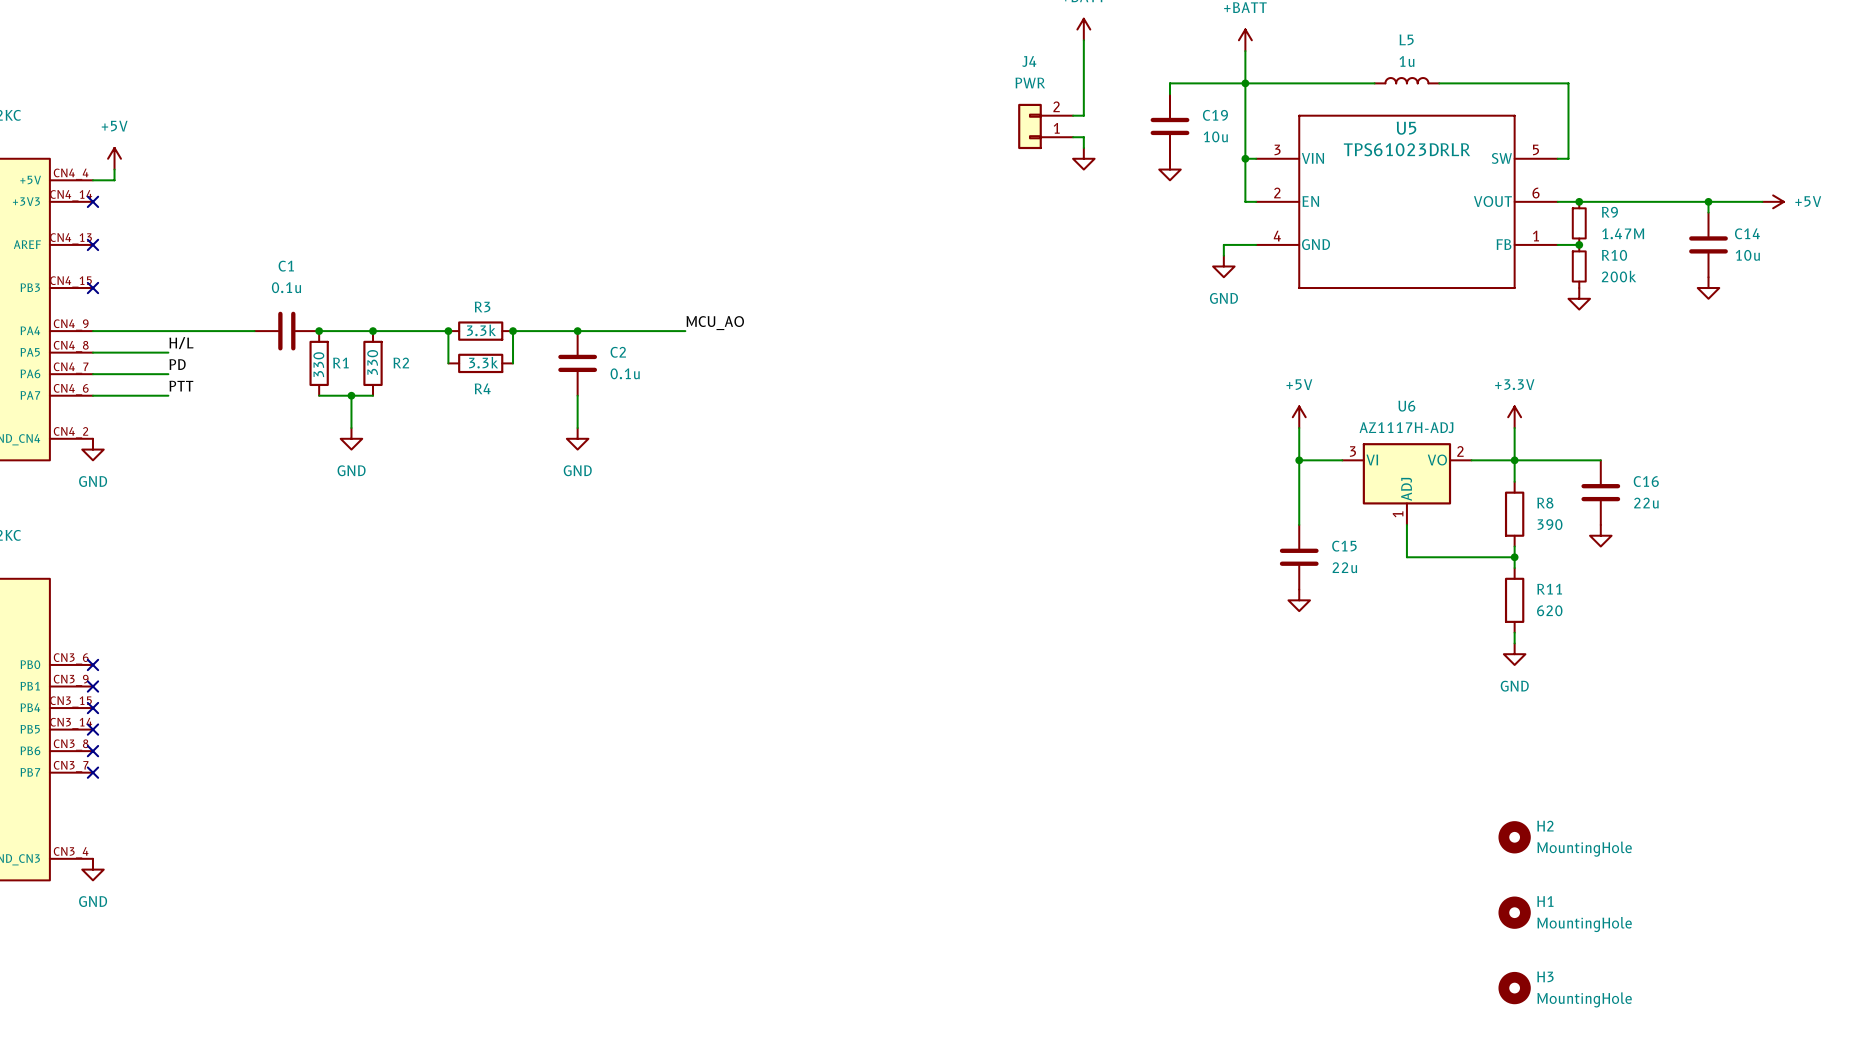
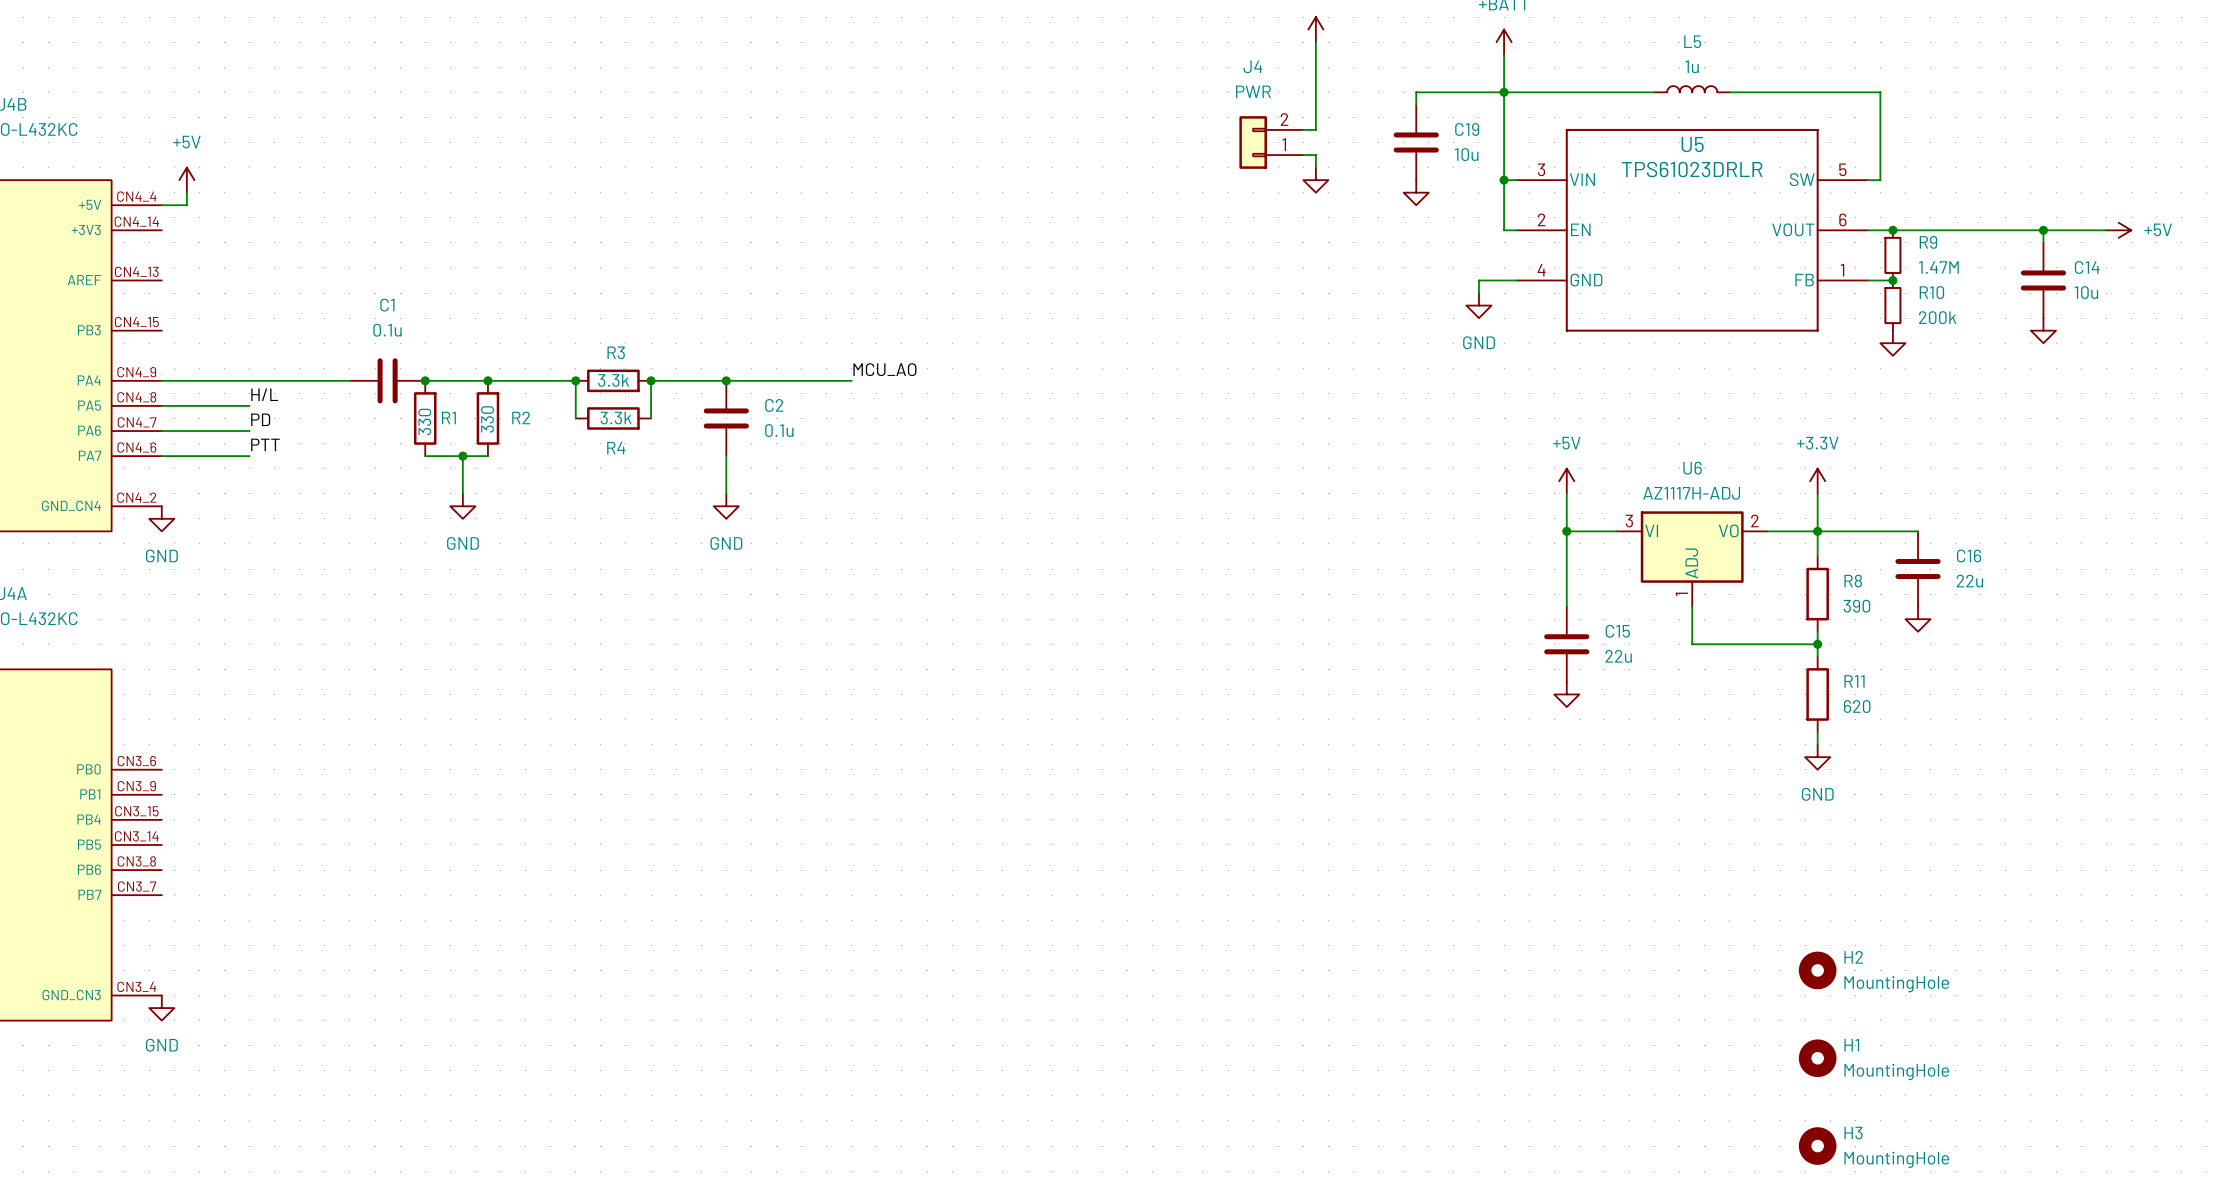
no-connect mark: (92, 201) -> none
no-connect mark: (92, 244) -> none
no-connect mark: (92, 288) -> none
no-connect mark: (92, 664) -> none
no-connect mark: (92, 686) -> none
no-connect mark: (92, 708) -> none
no-connect mark: (92, 729) -> none
no-connect mark: (92, 751) -> none
no-connect mark: (92, 772) -> none

